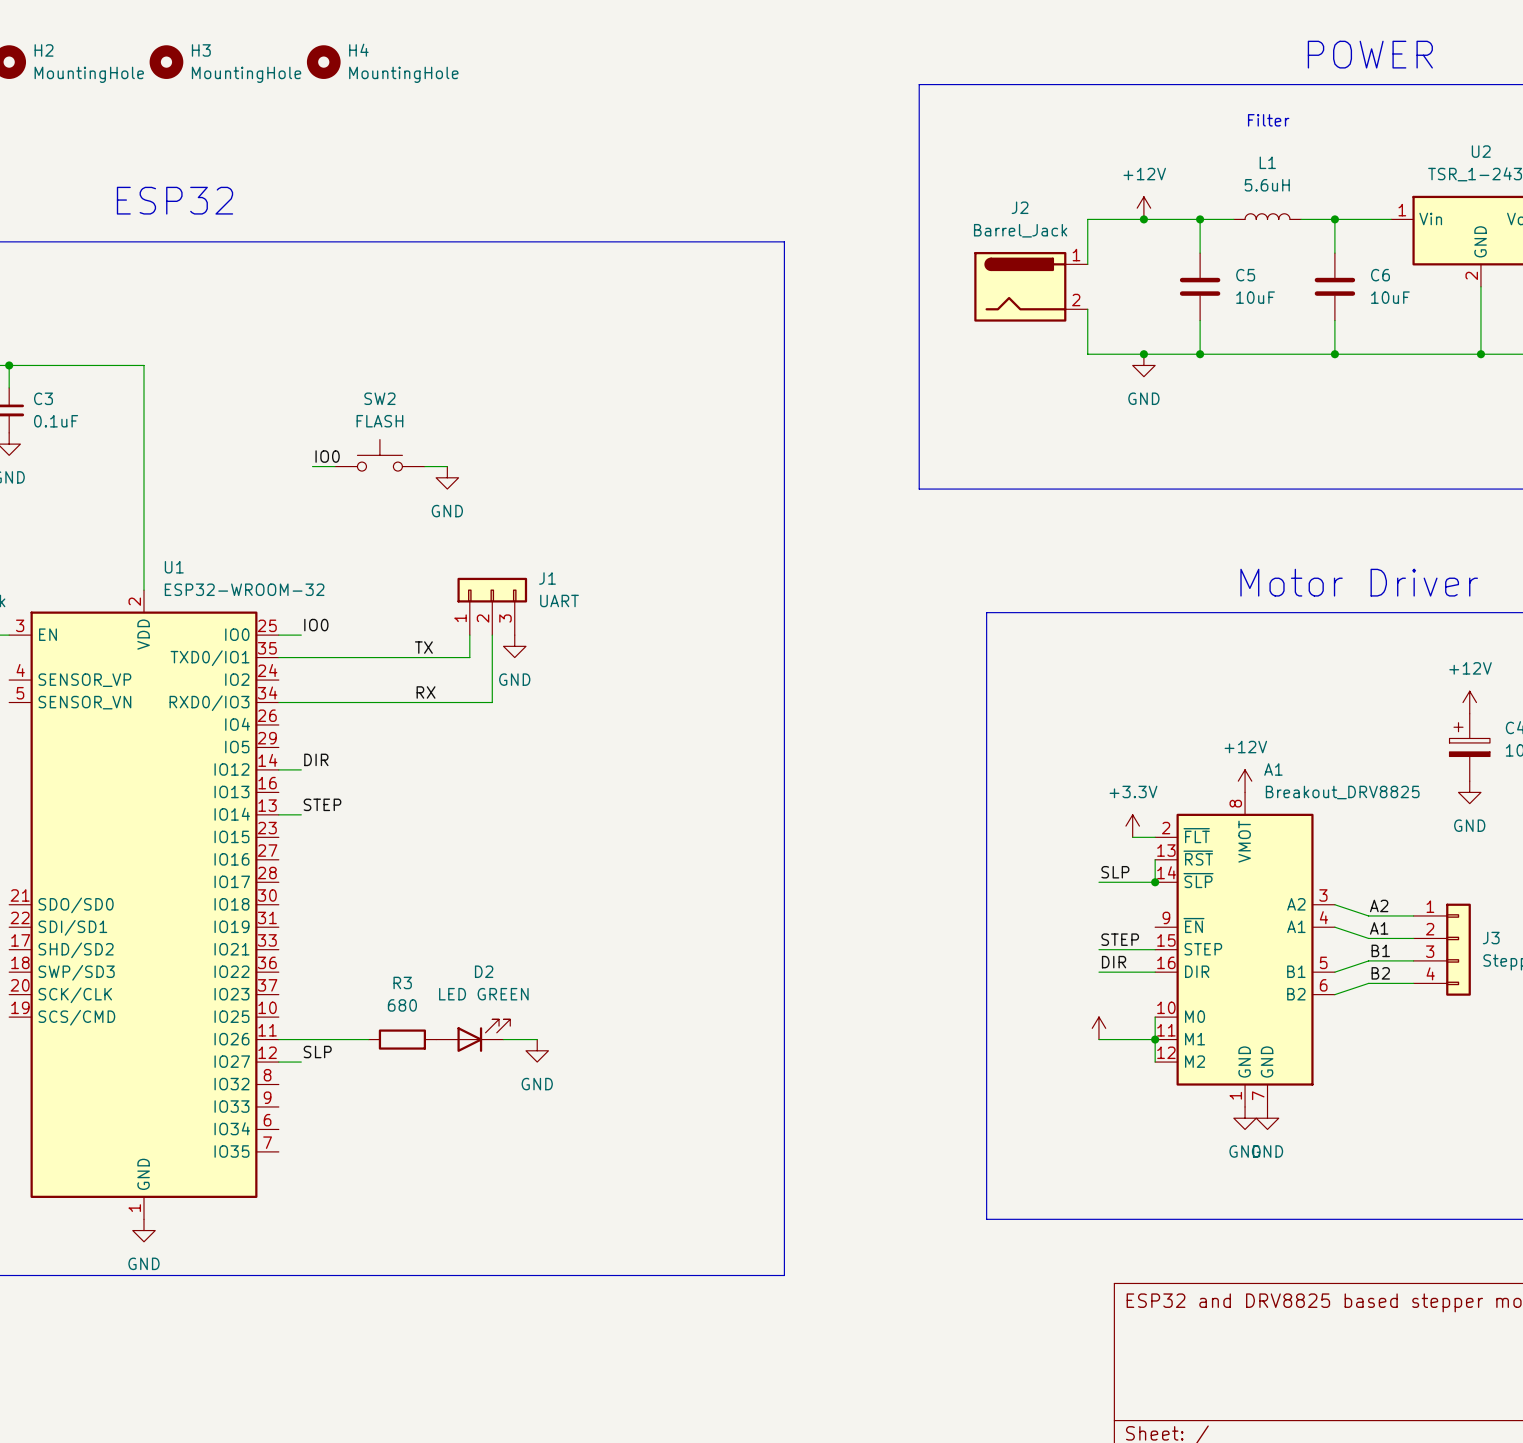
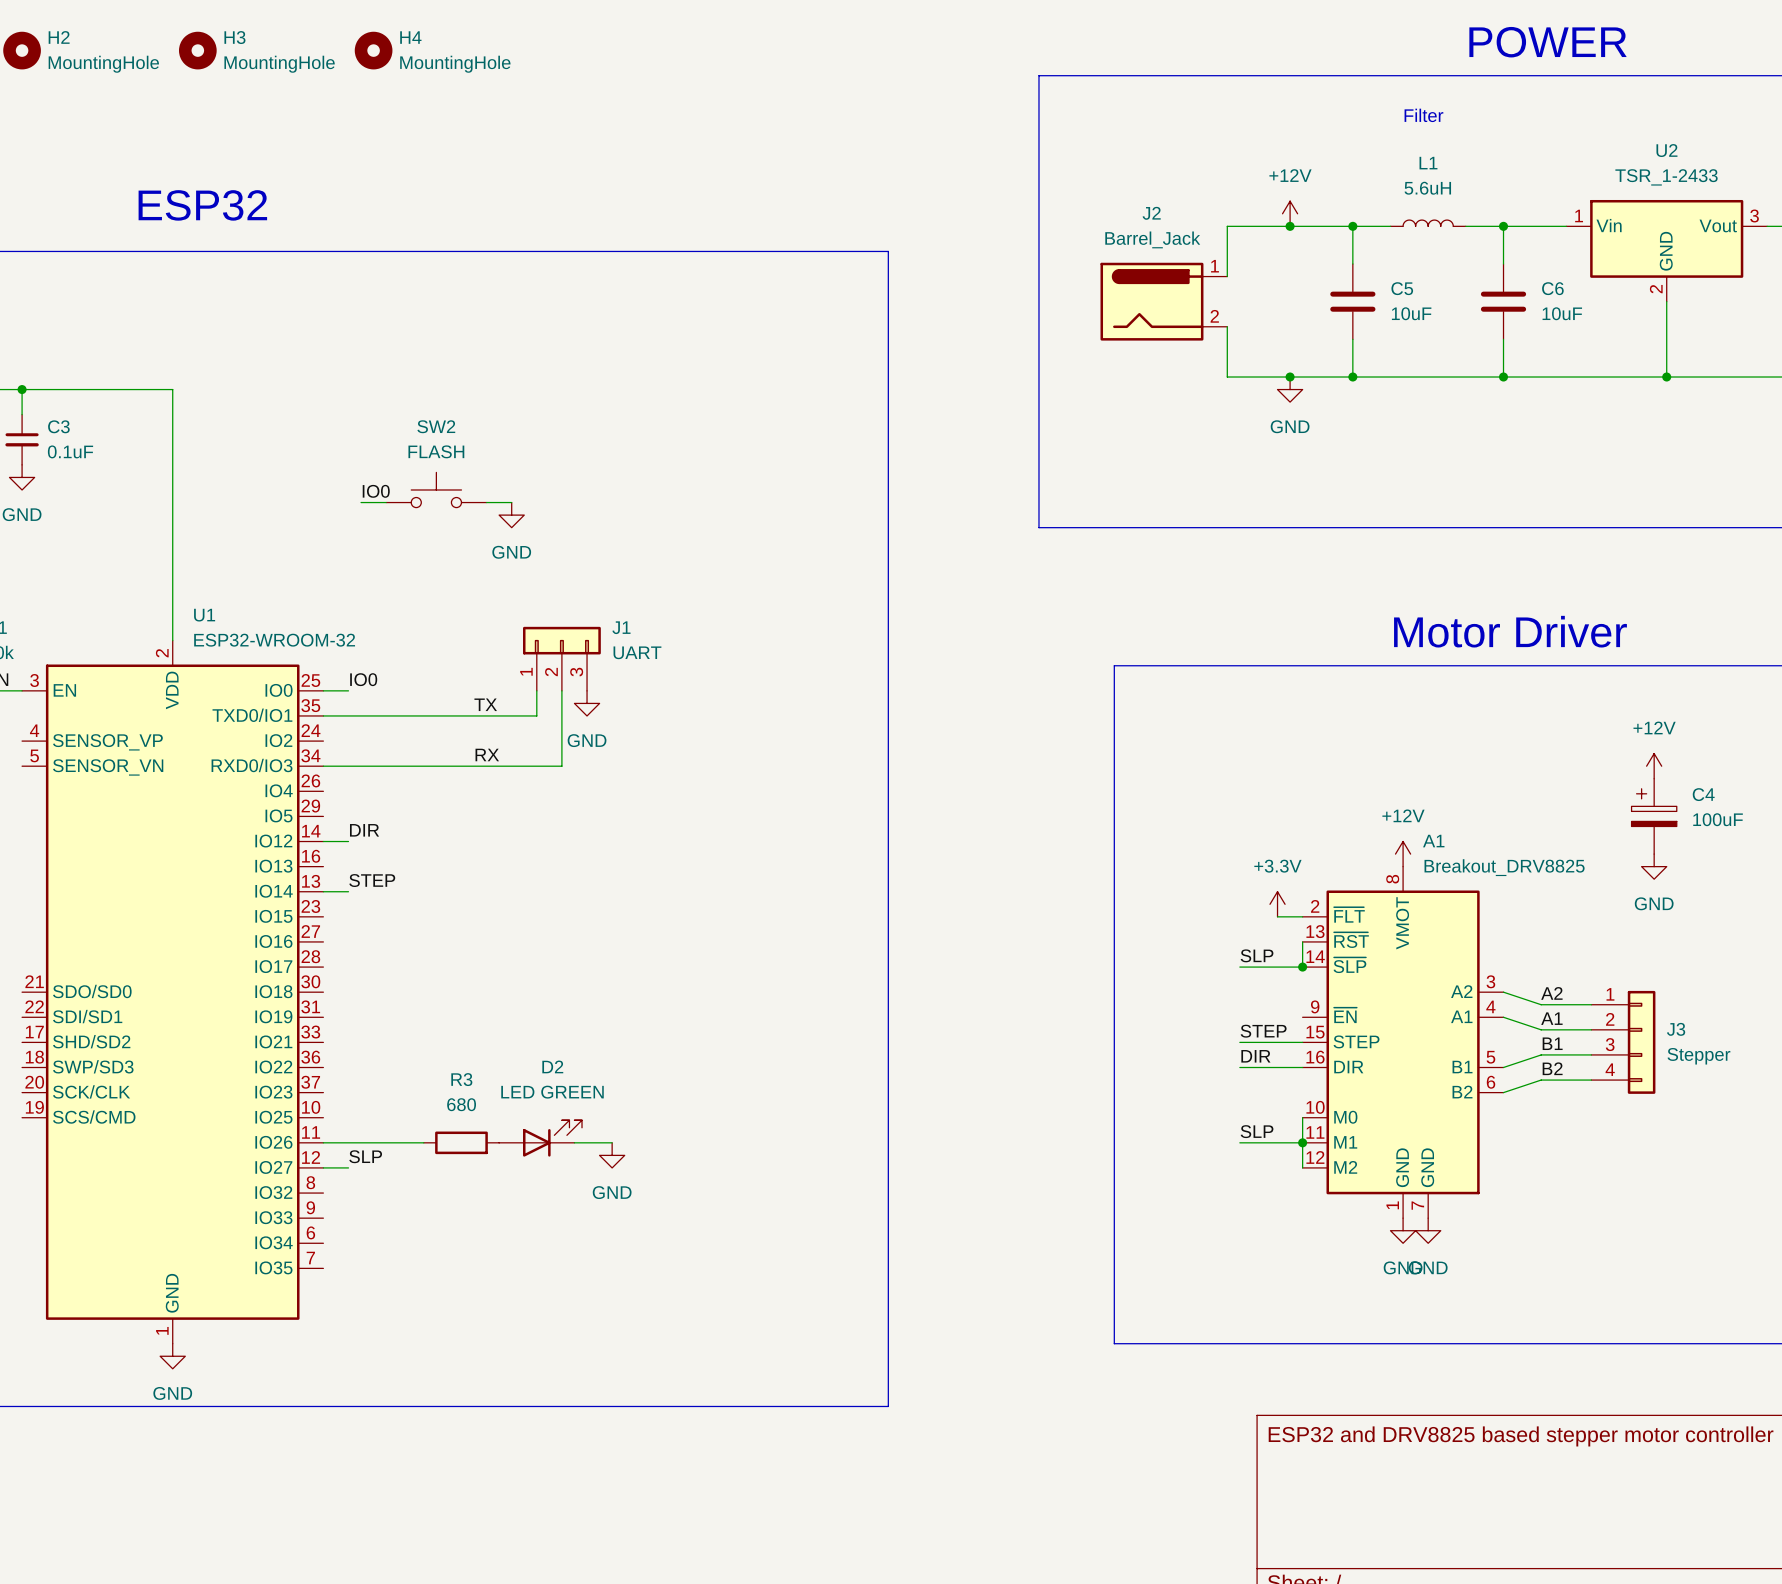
power symbol: (1098, 1028) -> none
label: none -> SLP (1257, 1131)

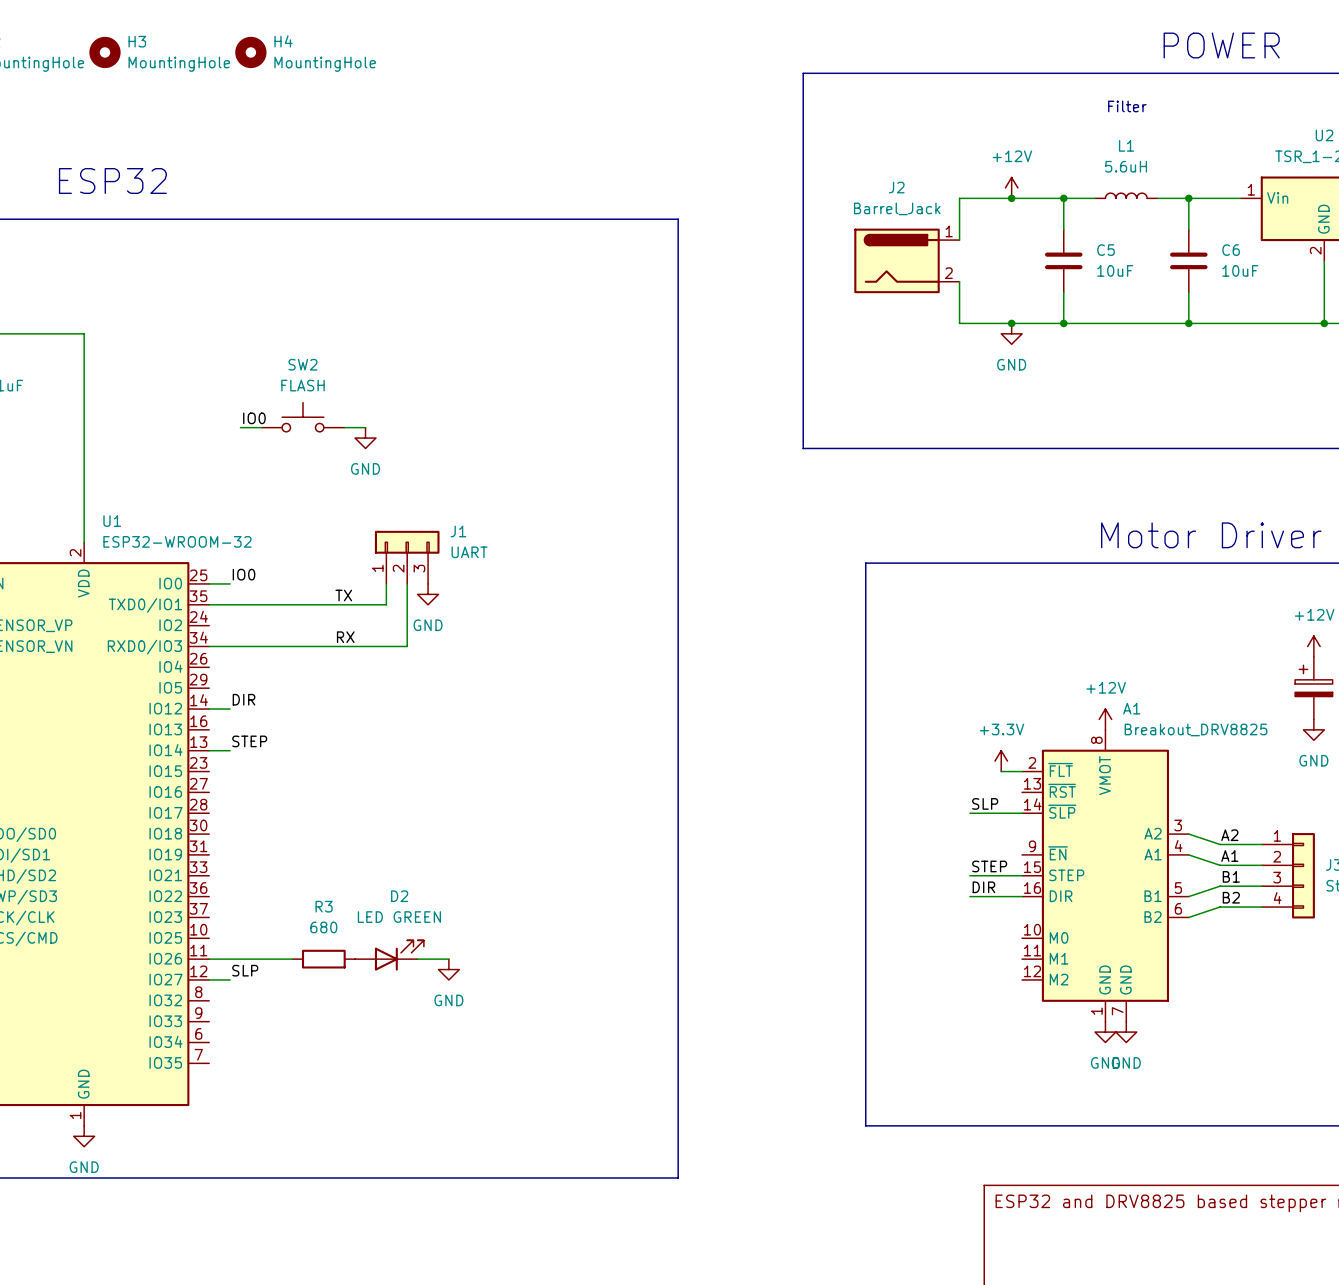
wire: (1302, 941) (1302, 967) -> none
junction: (1302, 967) -> none
wire: (1302, 1117) (1302, 1167) -> none
label: SLP (1257, 1131) -> none
wire: (1239, 1142) (1302, 1142) -> none
junction: (1302, 1142) -> none

